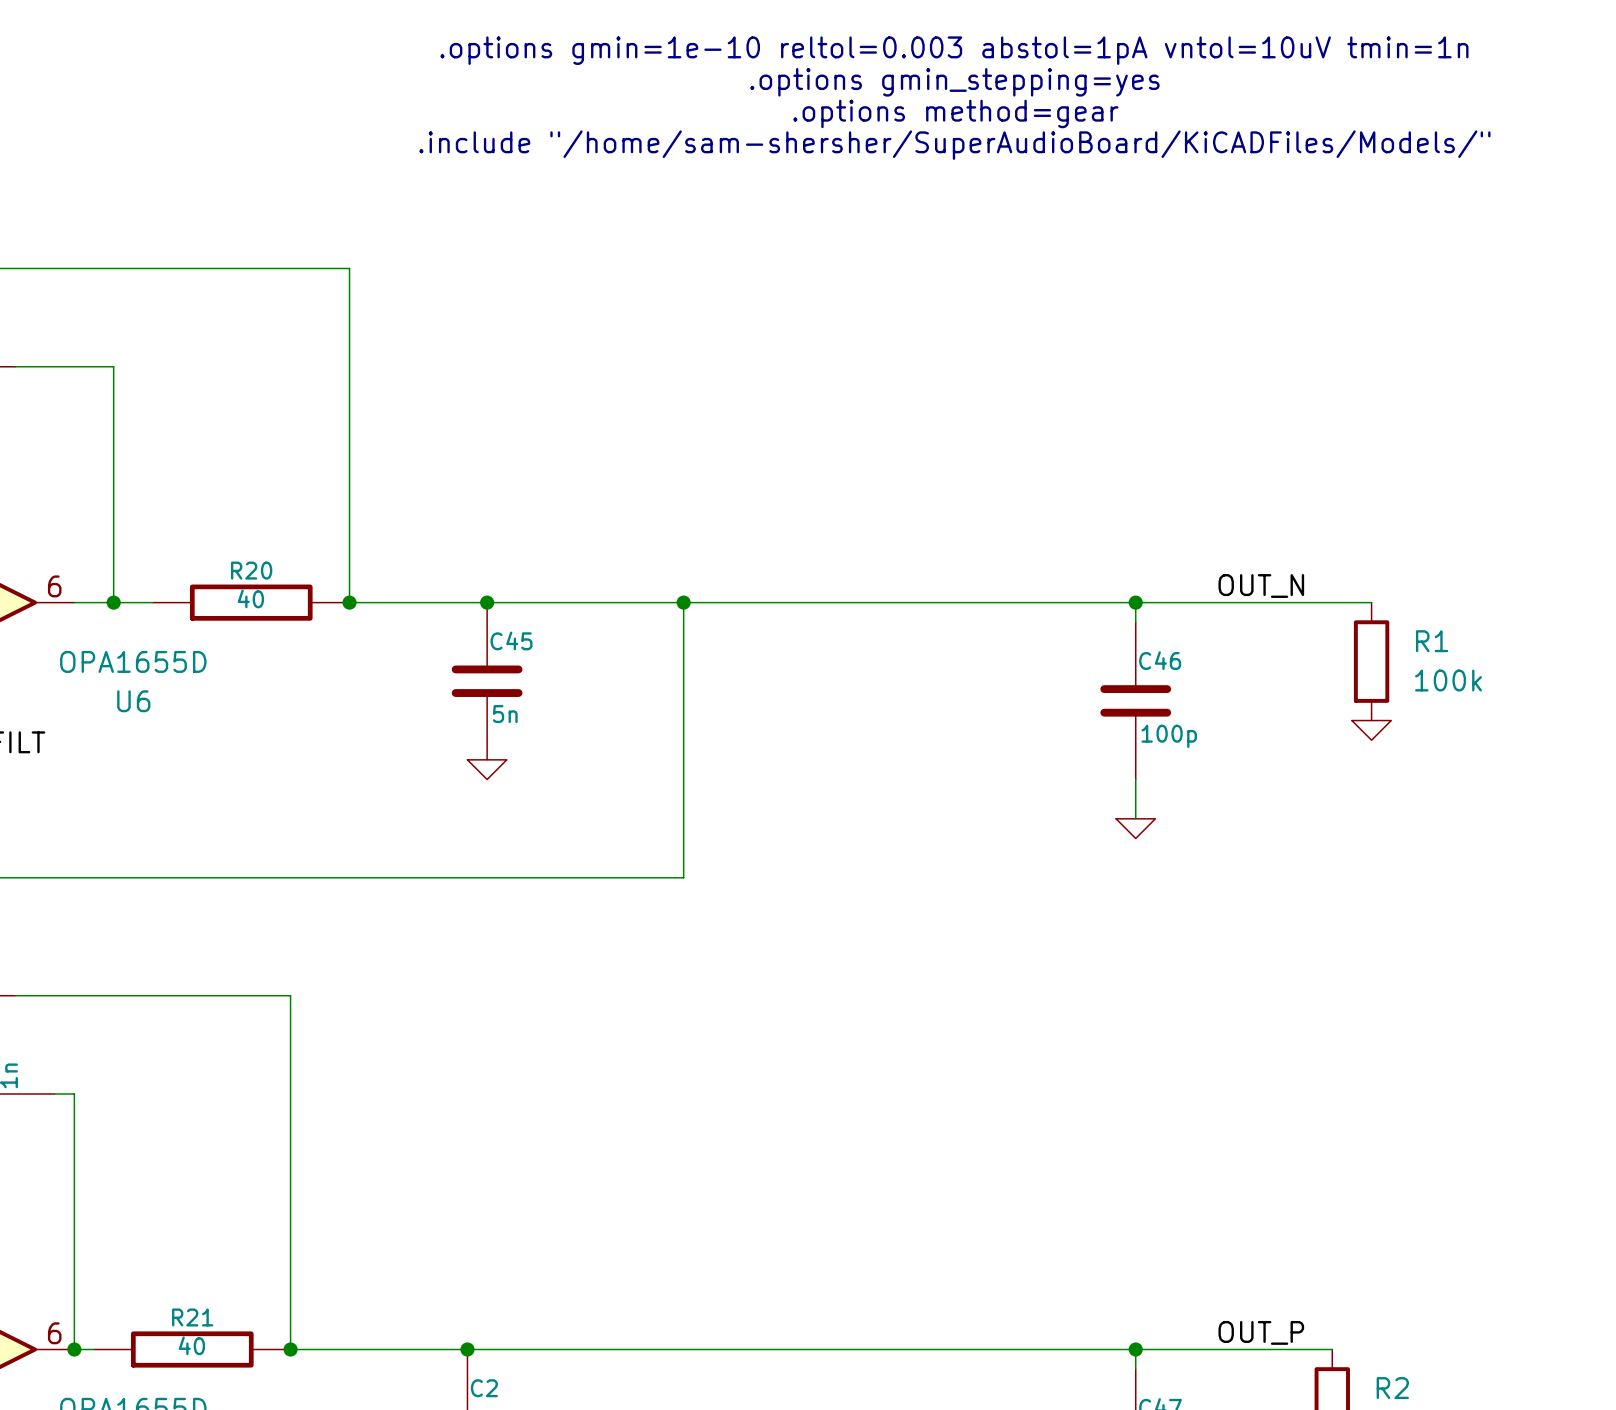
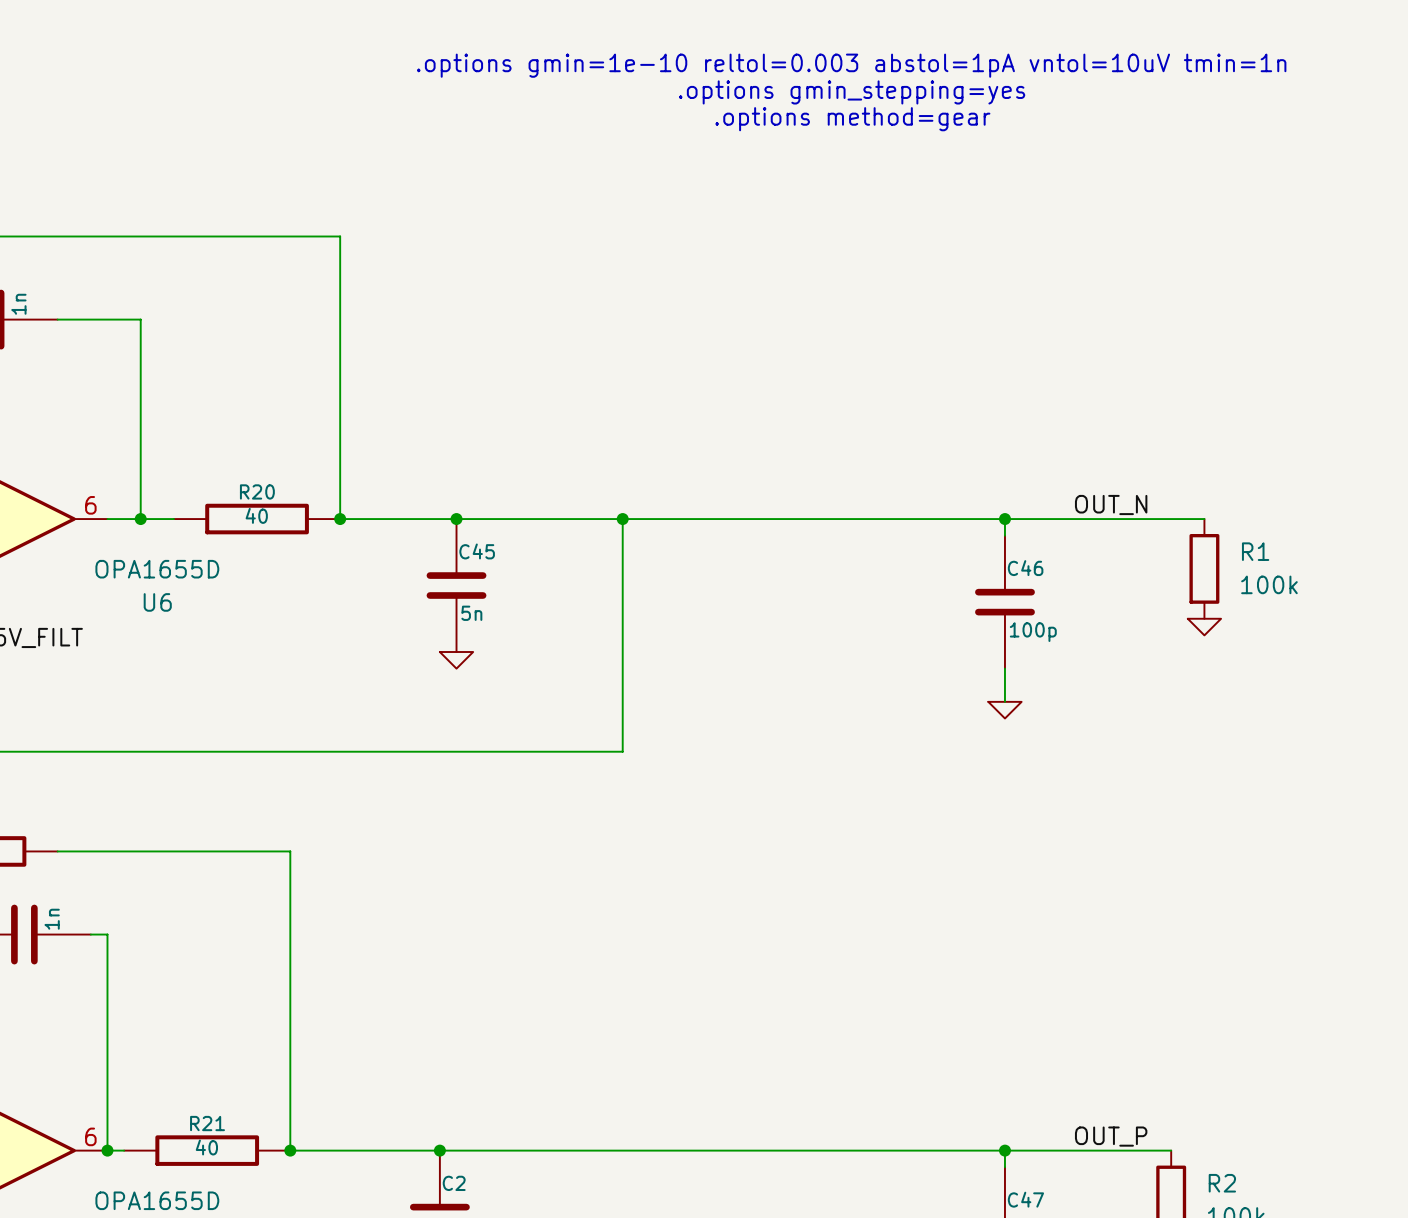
text position: .options gmin=1e-10 reltol=0.003 abstol=1pA vntol=10uV tmin=1n (954, 50) -> .options gmin=1e-10 reltol=0.003 abstol=1pA vntol=10uV tmin=1n (851, 65)
text position: .options gmin_stepping=yes (954, 82) -> .options gmin_stepping=yes (852, 92)
text position: .options method=gear (955, 113) -> .options method=gear (852, 119)
text: .include "/home/sam-shersher/SuperAudioBoard/KiCADFiles/Models/" (954, 145) -> none

